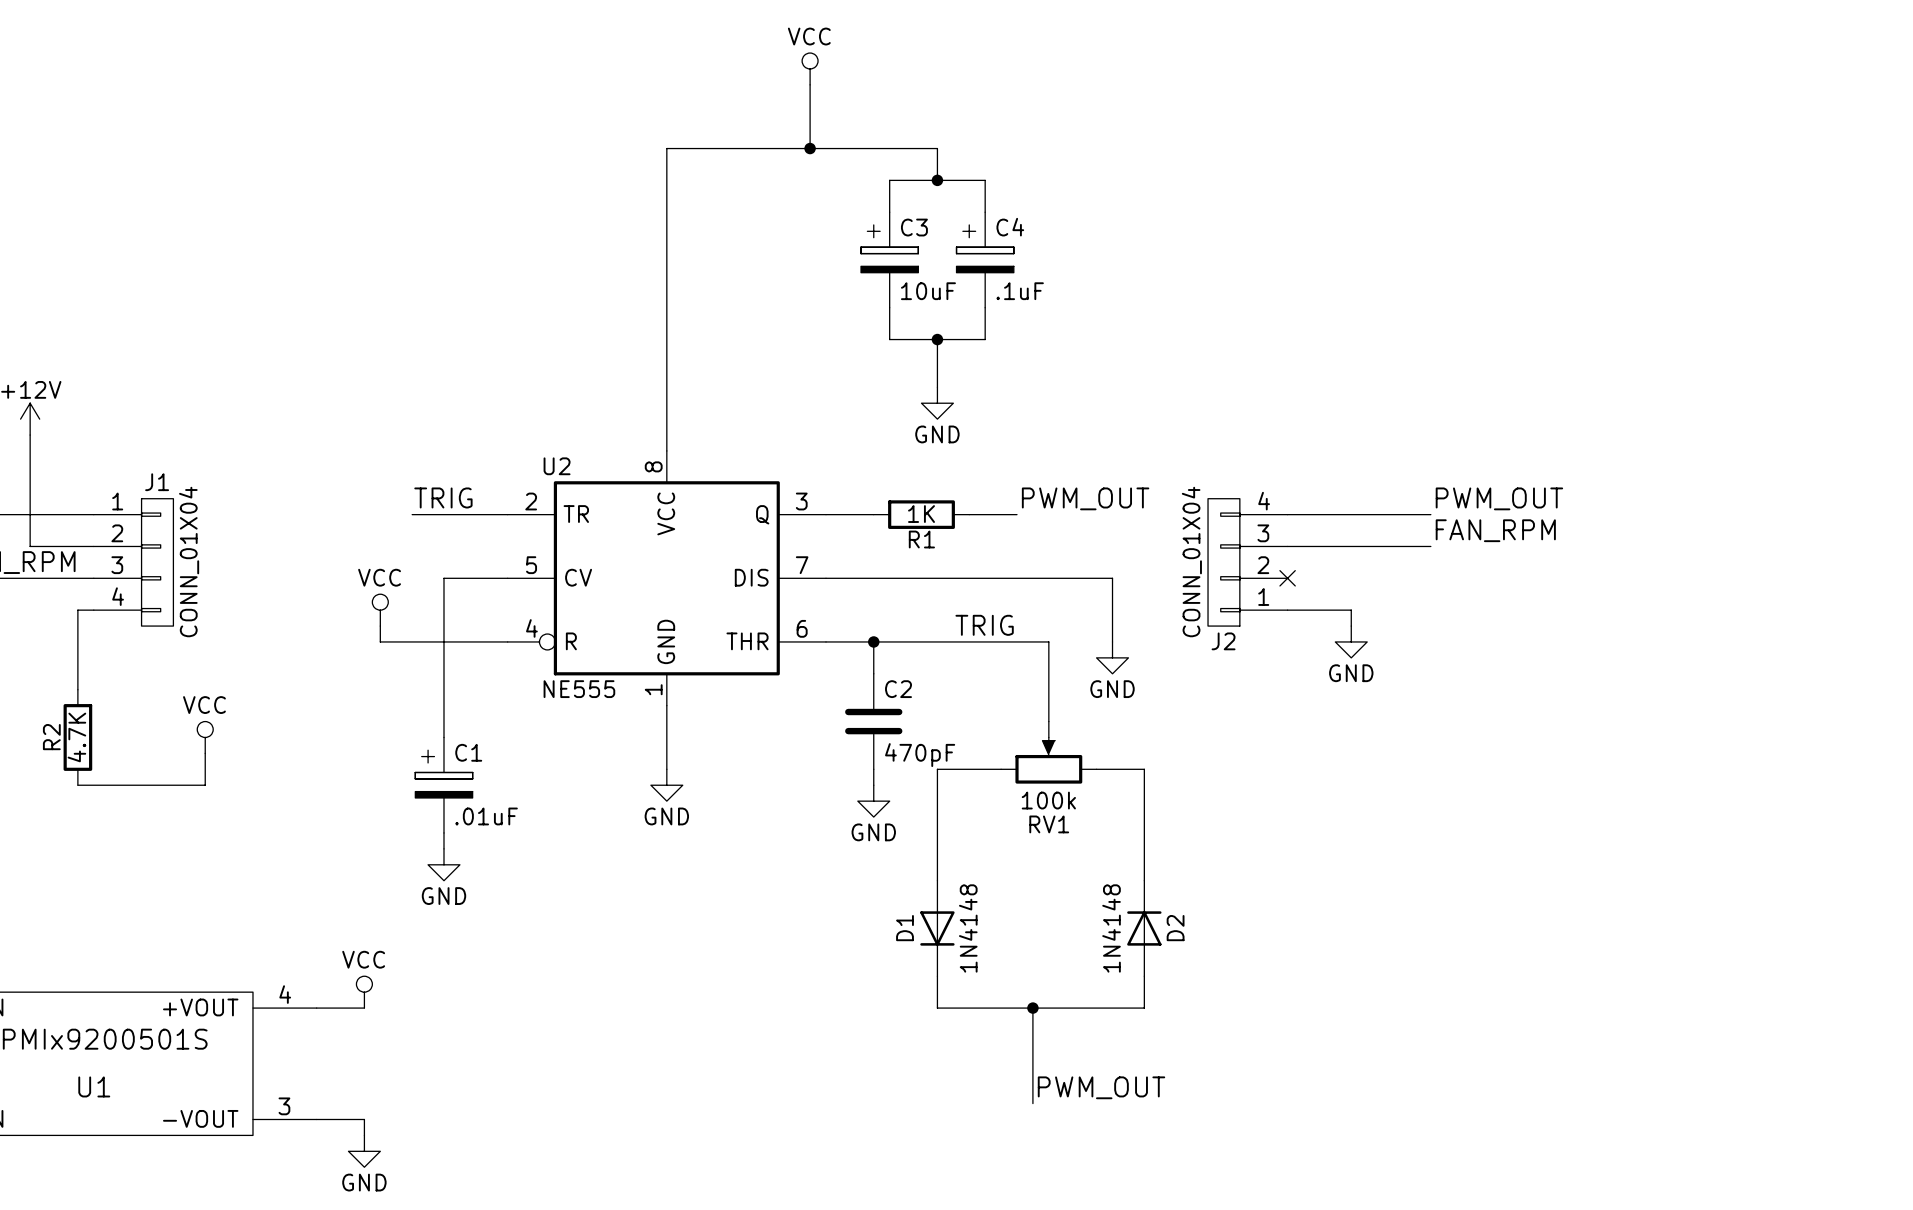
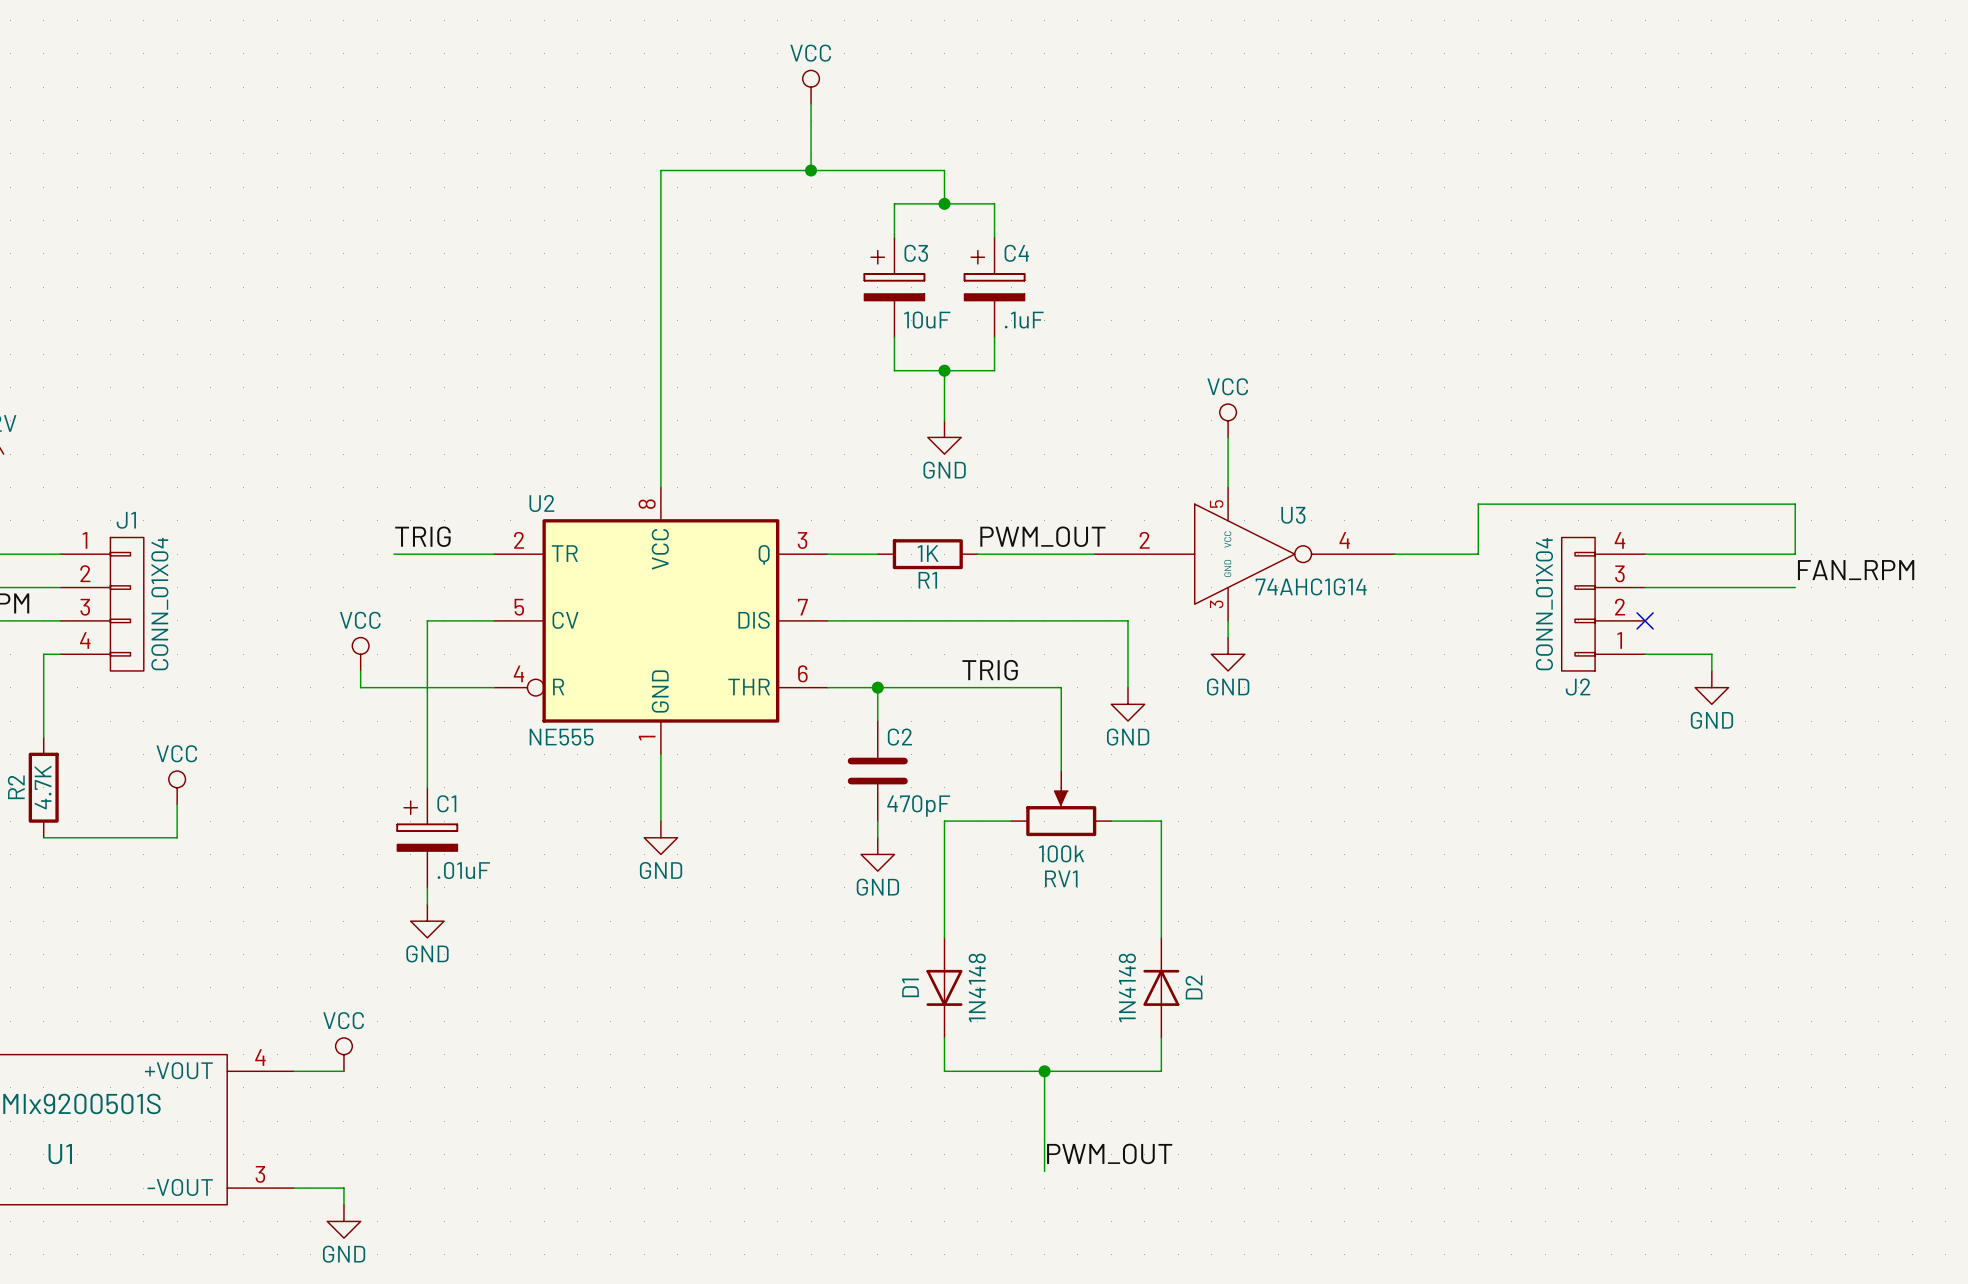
power symbol: none -> VCC (1228, 420)
wire: none -> (1228, 437) (1228, 487)
label position: PWM_OUT (1085, 498) -> PWM_OUT (1042, 536)
label: PWM_OUT (1499, 498) -> none
wire: none -> (1027, 554) (1094, 554)
U3: none -> 74AHC1G14 (1244, 554)
wire: none -> (1461, 554) (1478, 554) (1478, 504) (1795, 504) (1795, 554) (1645, 554)
label: FAN_RPM (1495, 530) -> none
label: none -> FAN_RPM (1856, 570)
wire: (1287, 546) (1430, 546) -> none
wire: none -> (1645, 587) (1795, 587)
J2 position: (1247, 562) -> (1603, 604)
no-connect mark: (1287, 578) -> none
no-connect mark: none -> (1645, 620)
wire: (1287, 610) (1351, 610) (1351, 626) -> none
wire: none -> (1645, 654) (1711, 654) (1711, 670)
power symbol position: GND (1351, 641) -> GND (1228, 654)
power symbol: none -> GND (1711, 687)

